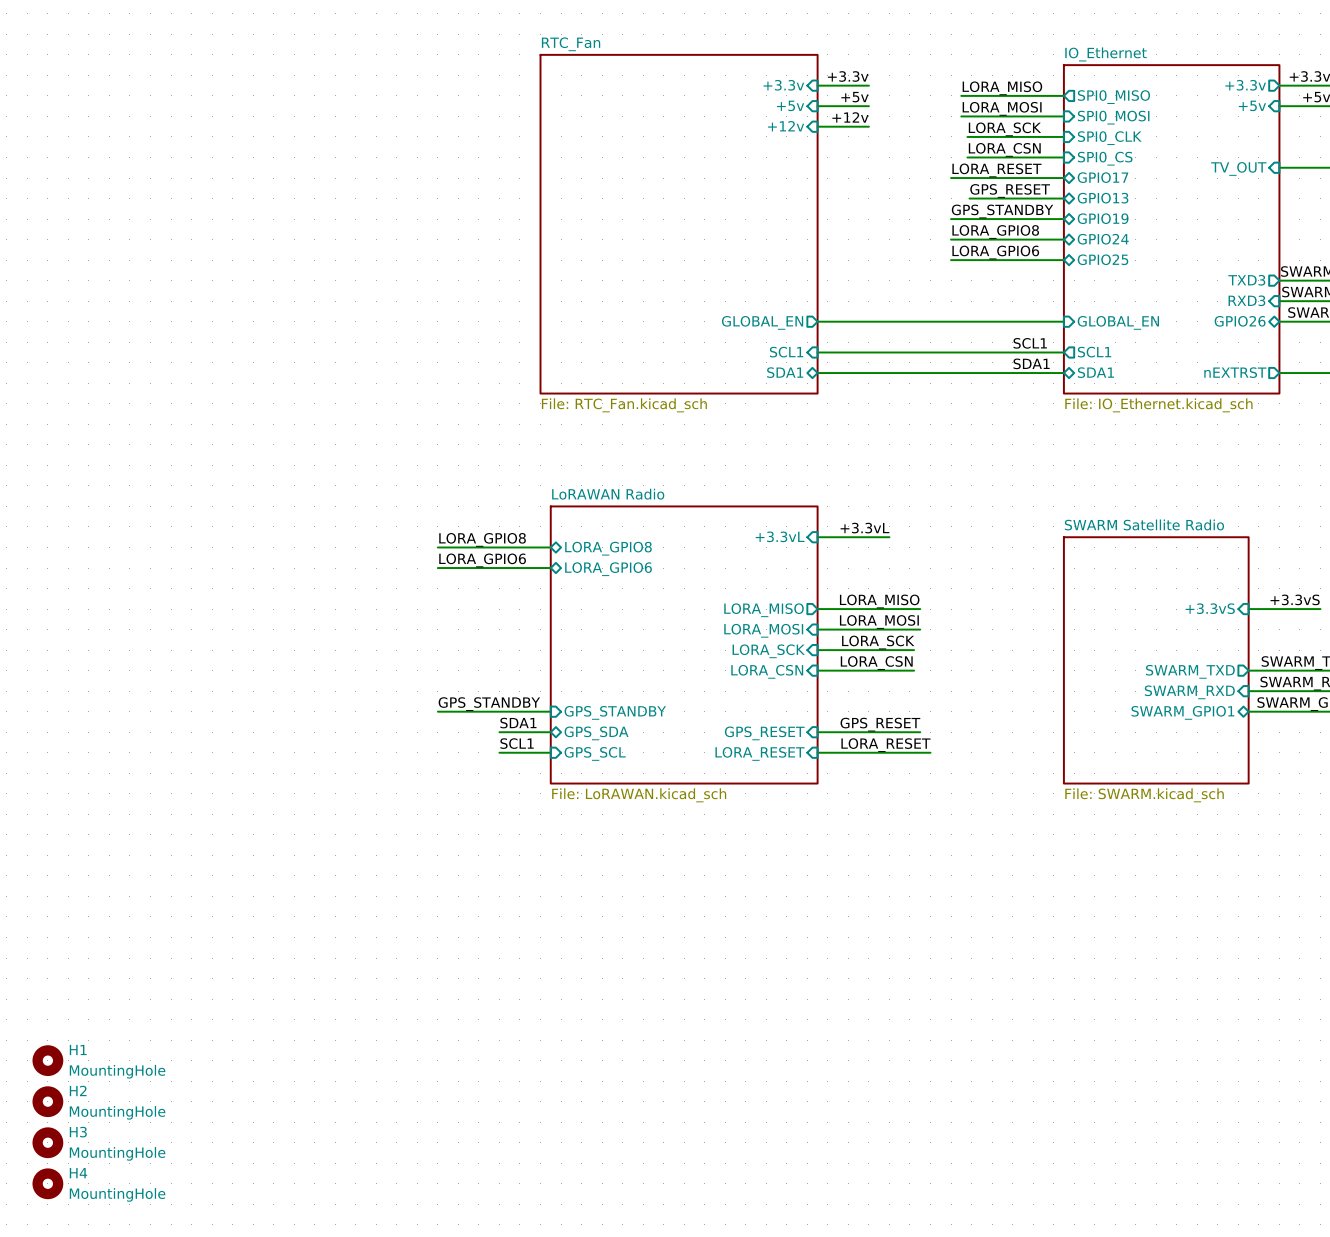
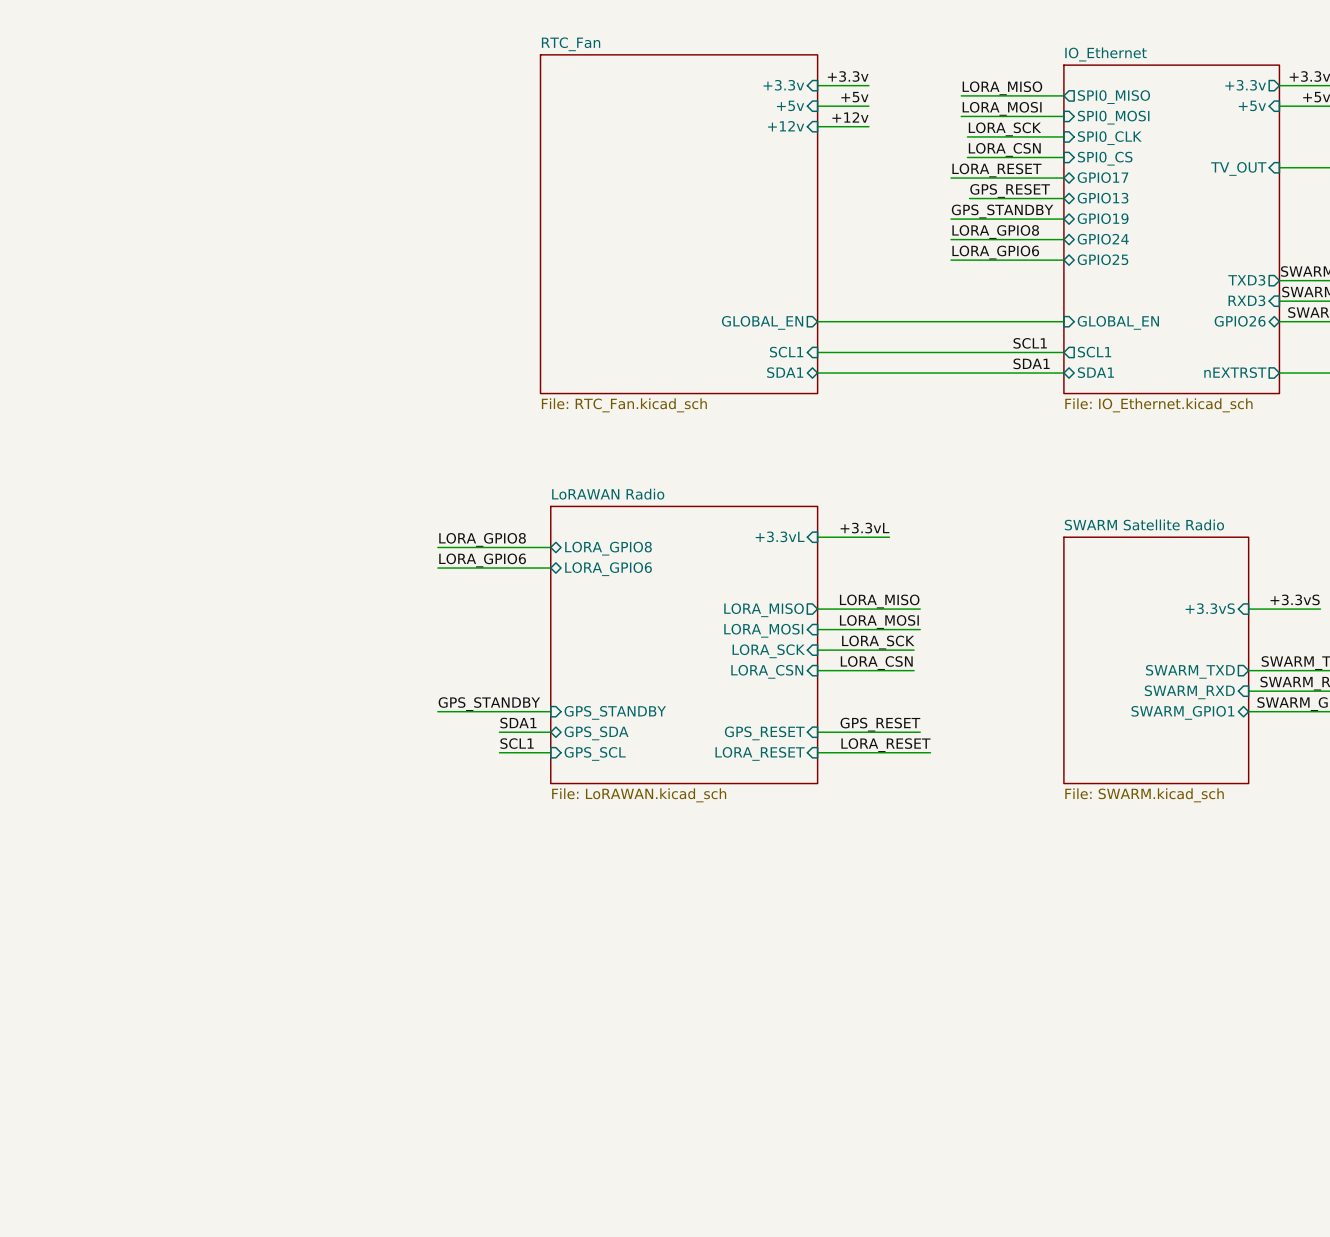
H1: MountingHole (47, 1060) -> none
H2: MountingHole (47, 1101) -> none
H3: MountingHole (47, 1142) -> none
H4: MountingHole (47, 1183) -> none

